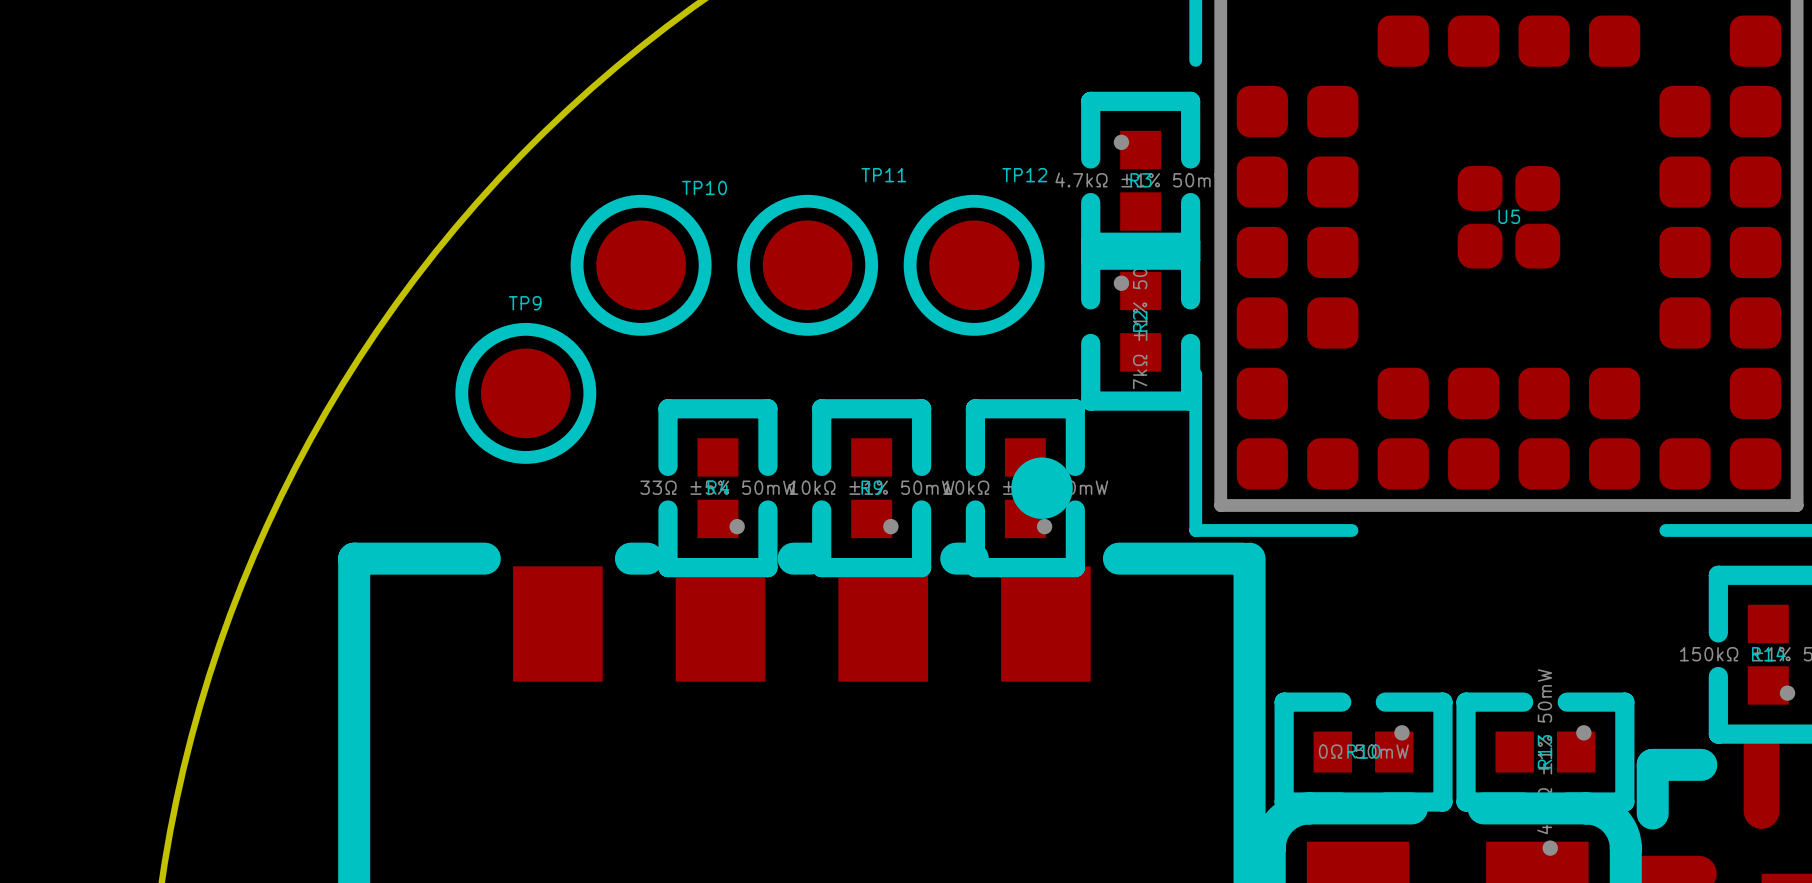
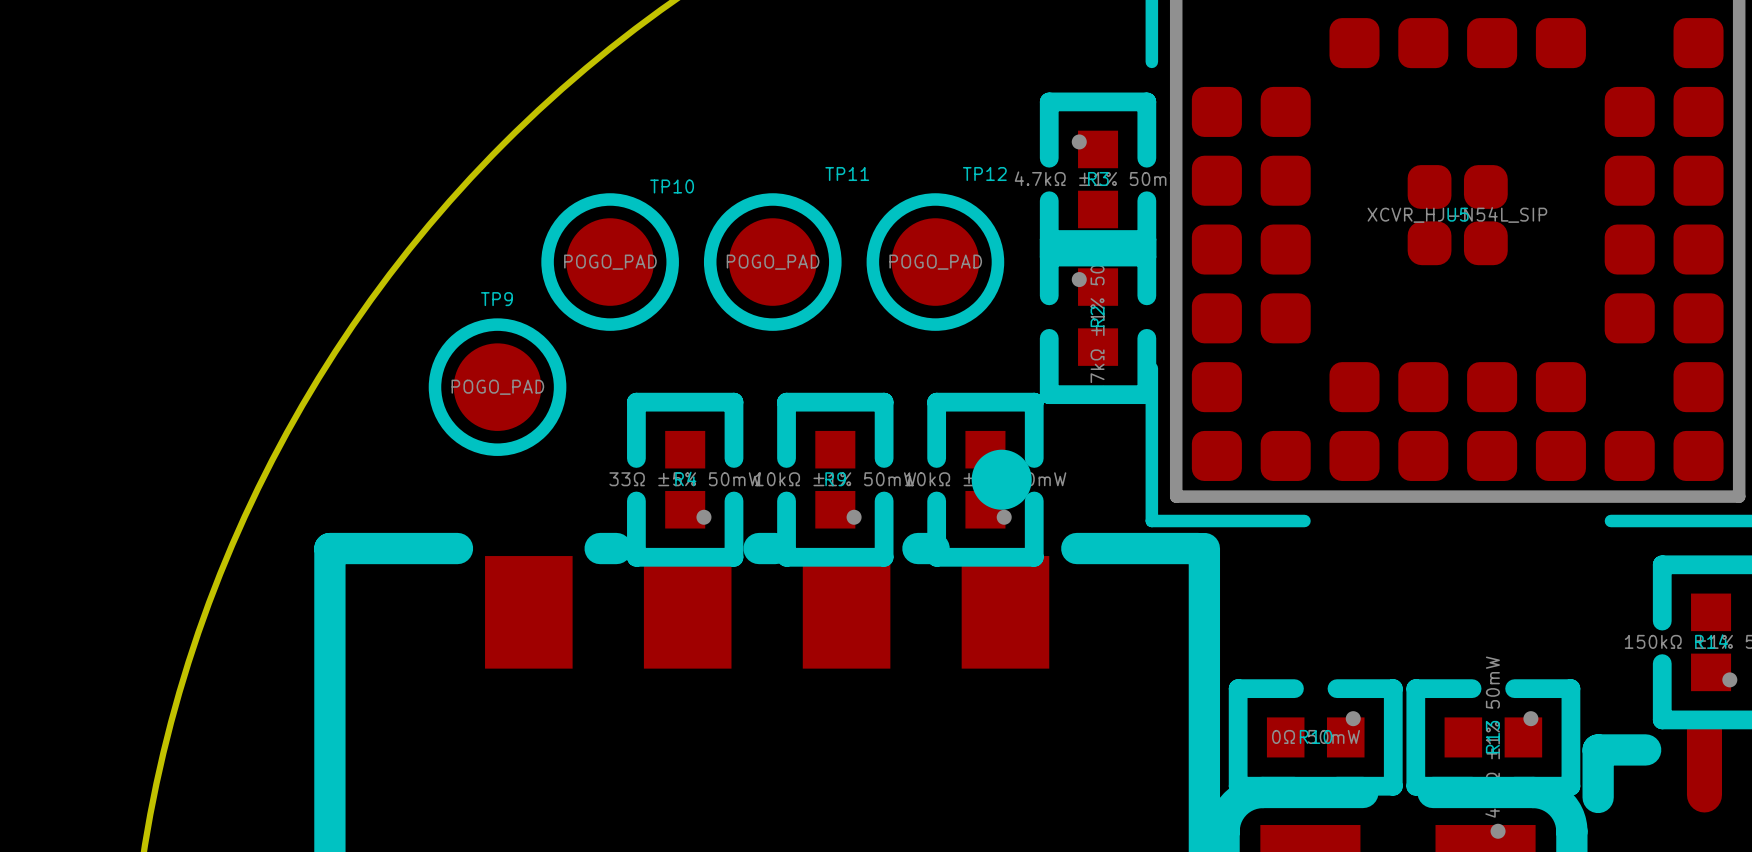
U5 value: none -> XCVR_HJ-N54L_SIP (1457, 214)
TP10 value: none -> POGO_PAD (610, 262)
TP11 value: none -> POGO_PAD (773, 262)
TP12 value: none -> POGO_PAD (935, 262)
TP9 value: none -> POGO_PAD (497, 387)

